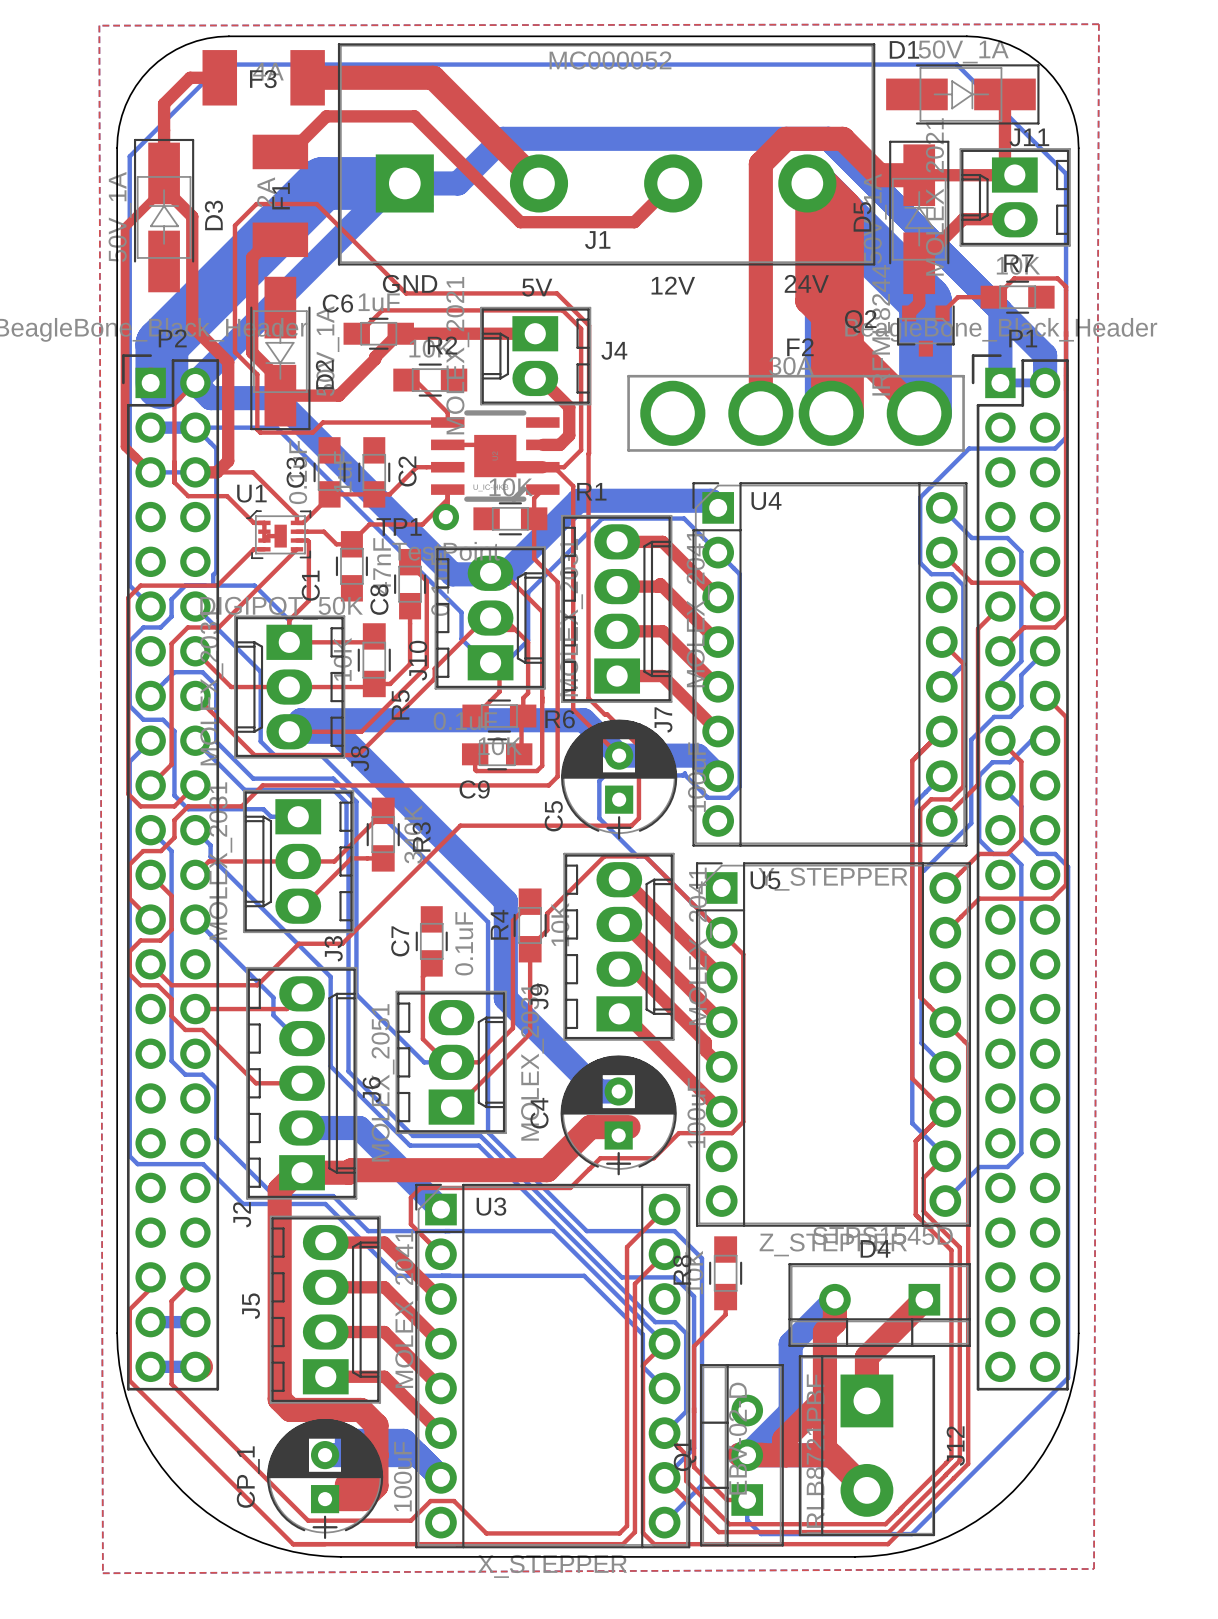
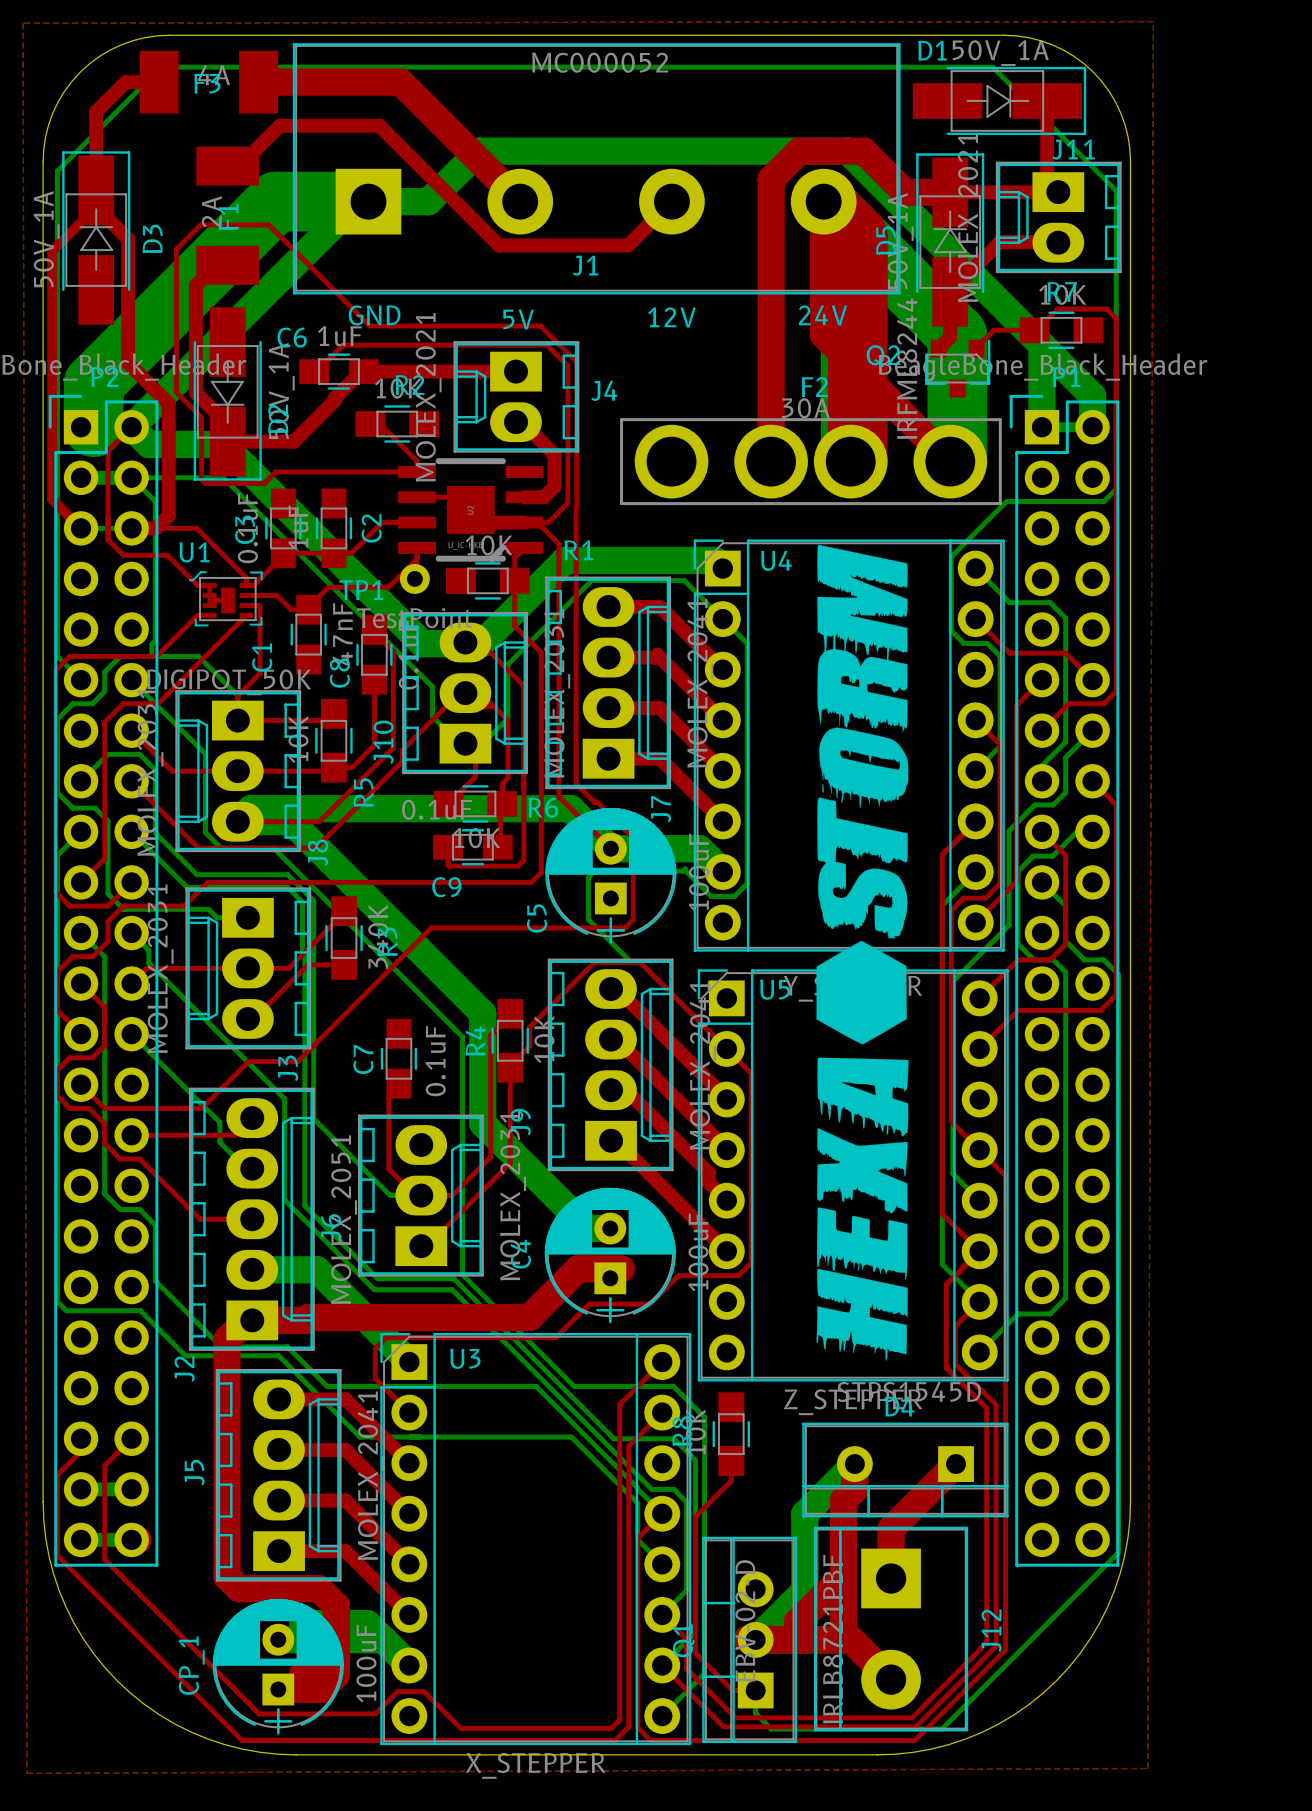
drawing: none -> [816, 544, 909, 1361]

